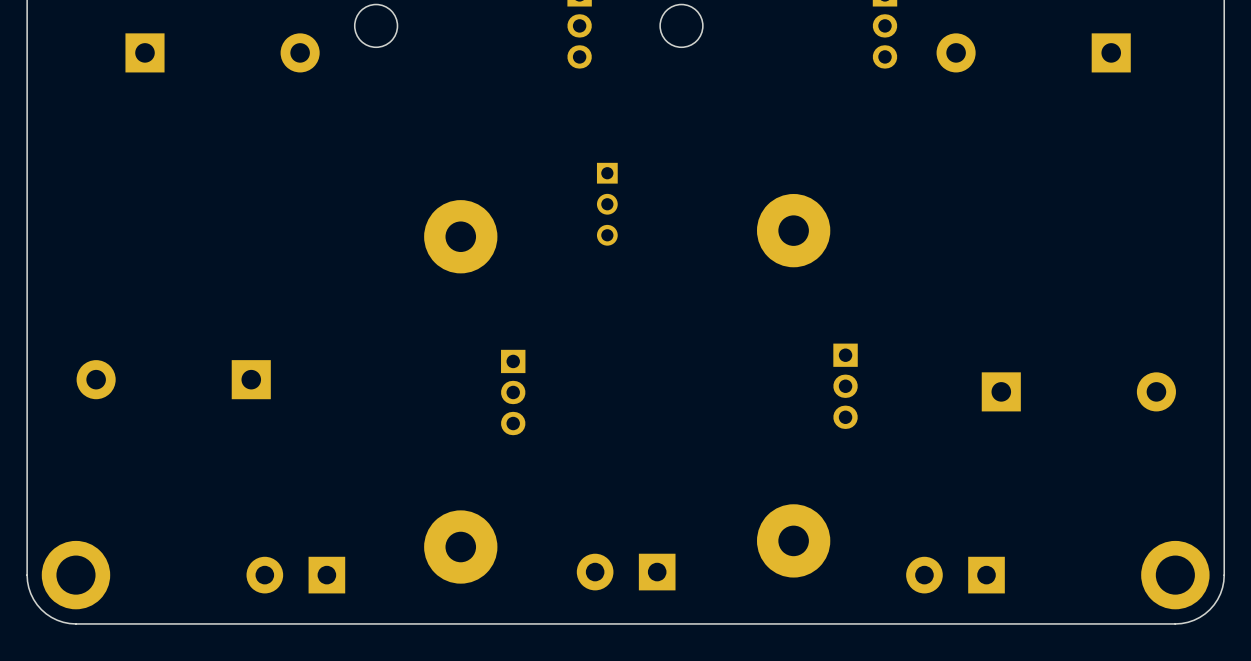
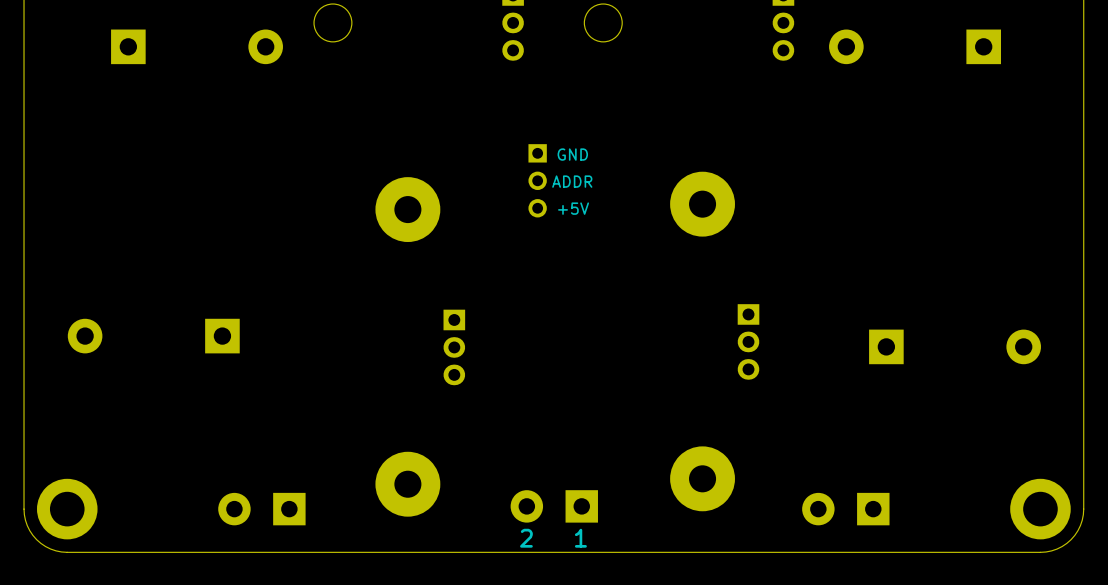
text: none -> GND (572, 154)
text: none -> ADDR (572, 181)
text: none -> +5V (573, 208)
text: none -> 2 (526, 538)
text: none -> 1 (580, 538)

